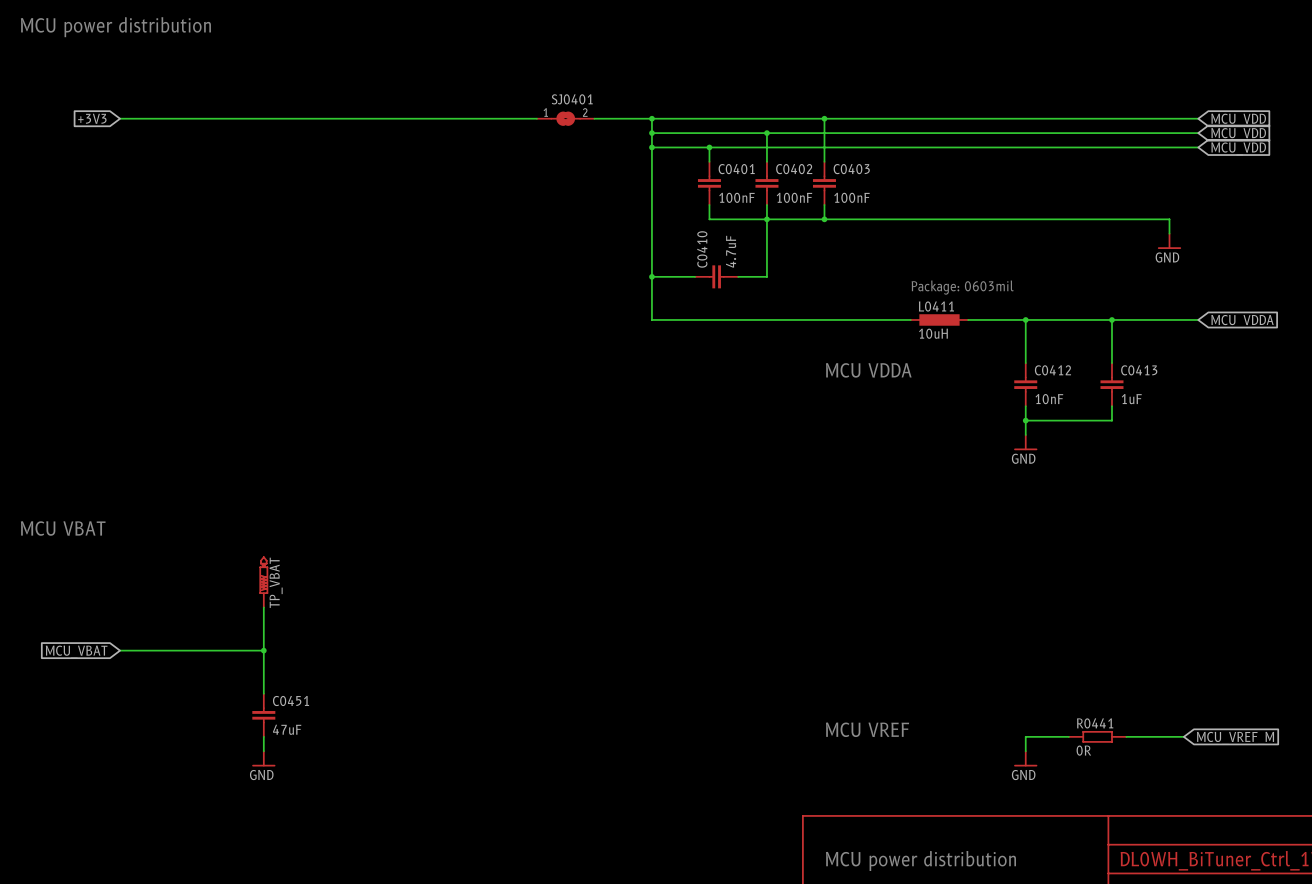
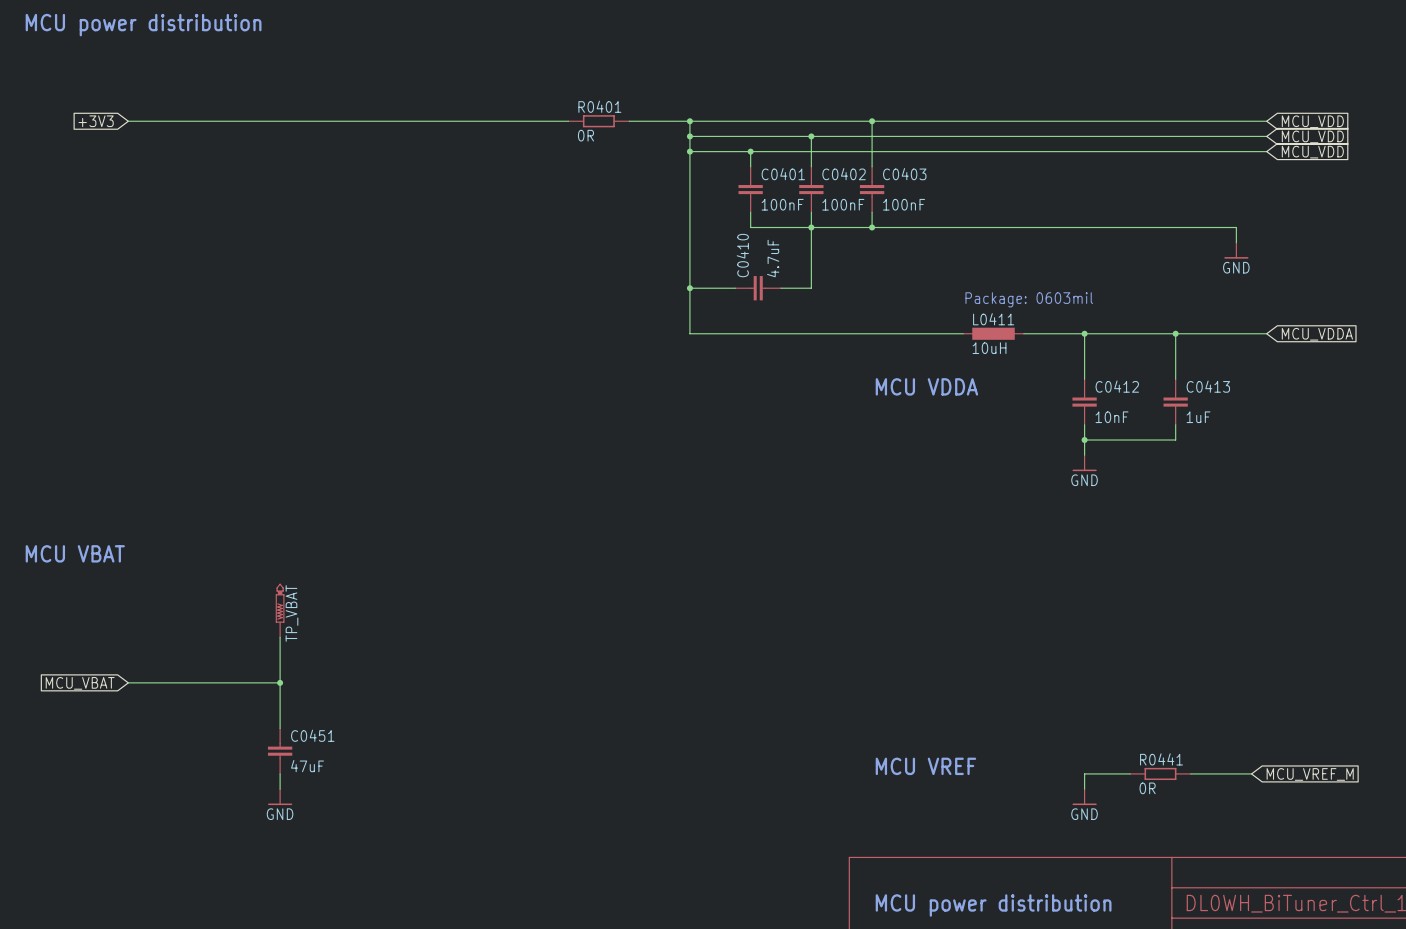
SJ0401: (565, 118) -> none
R0401: none -> 0R (598, 121)

